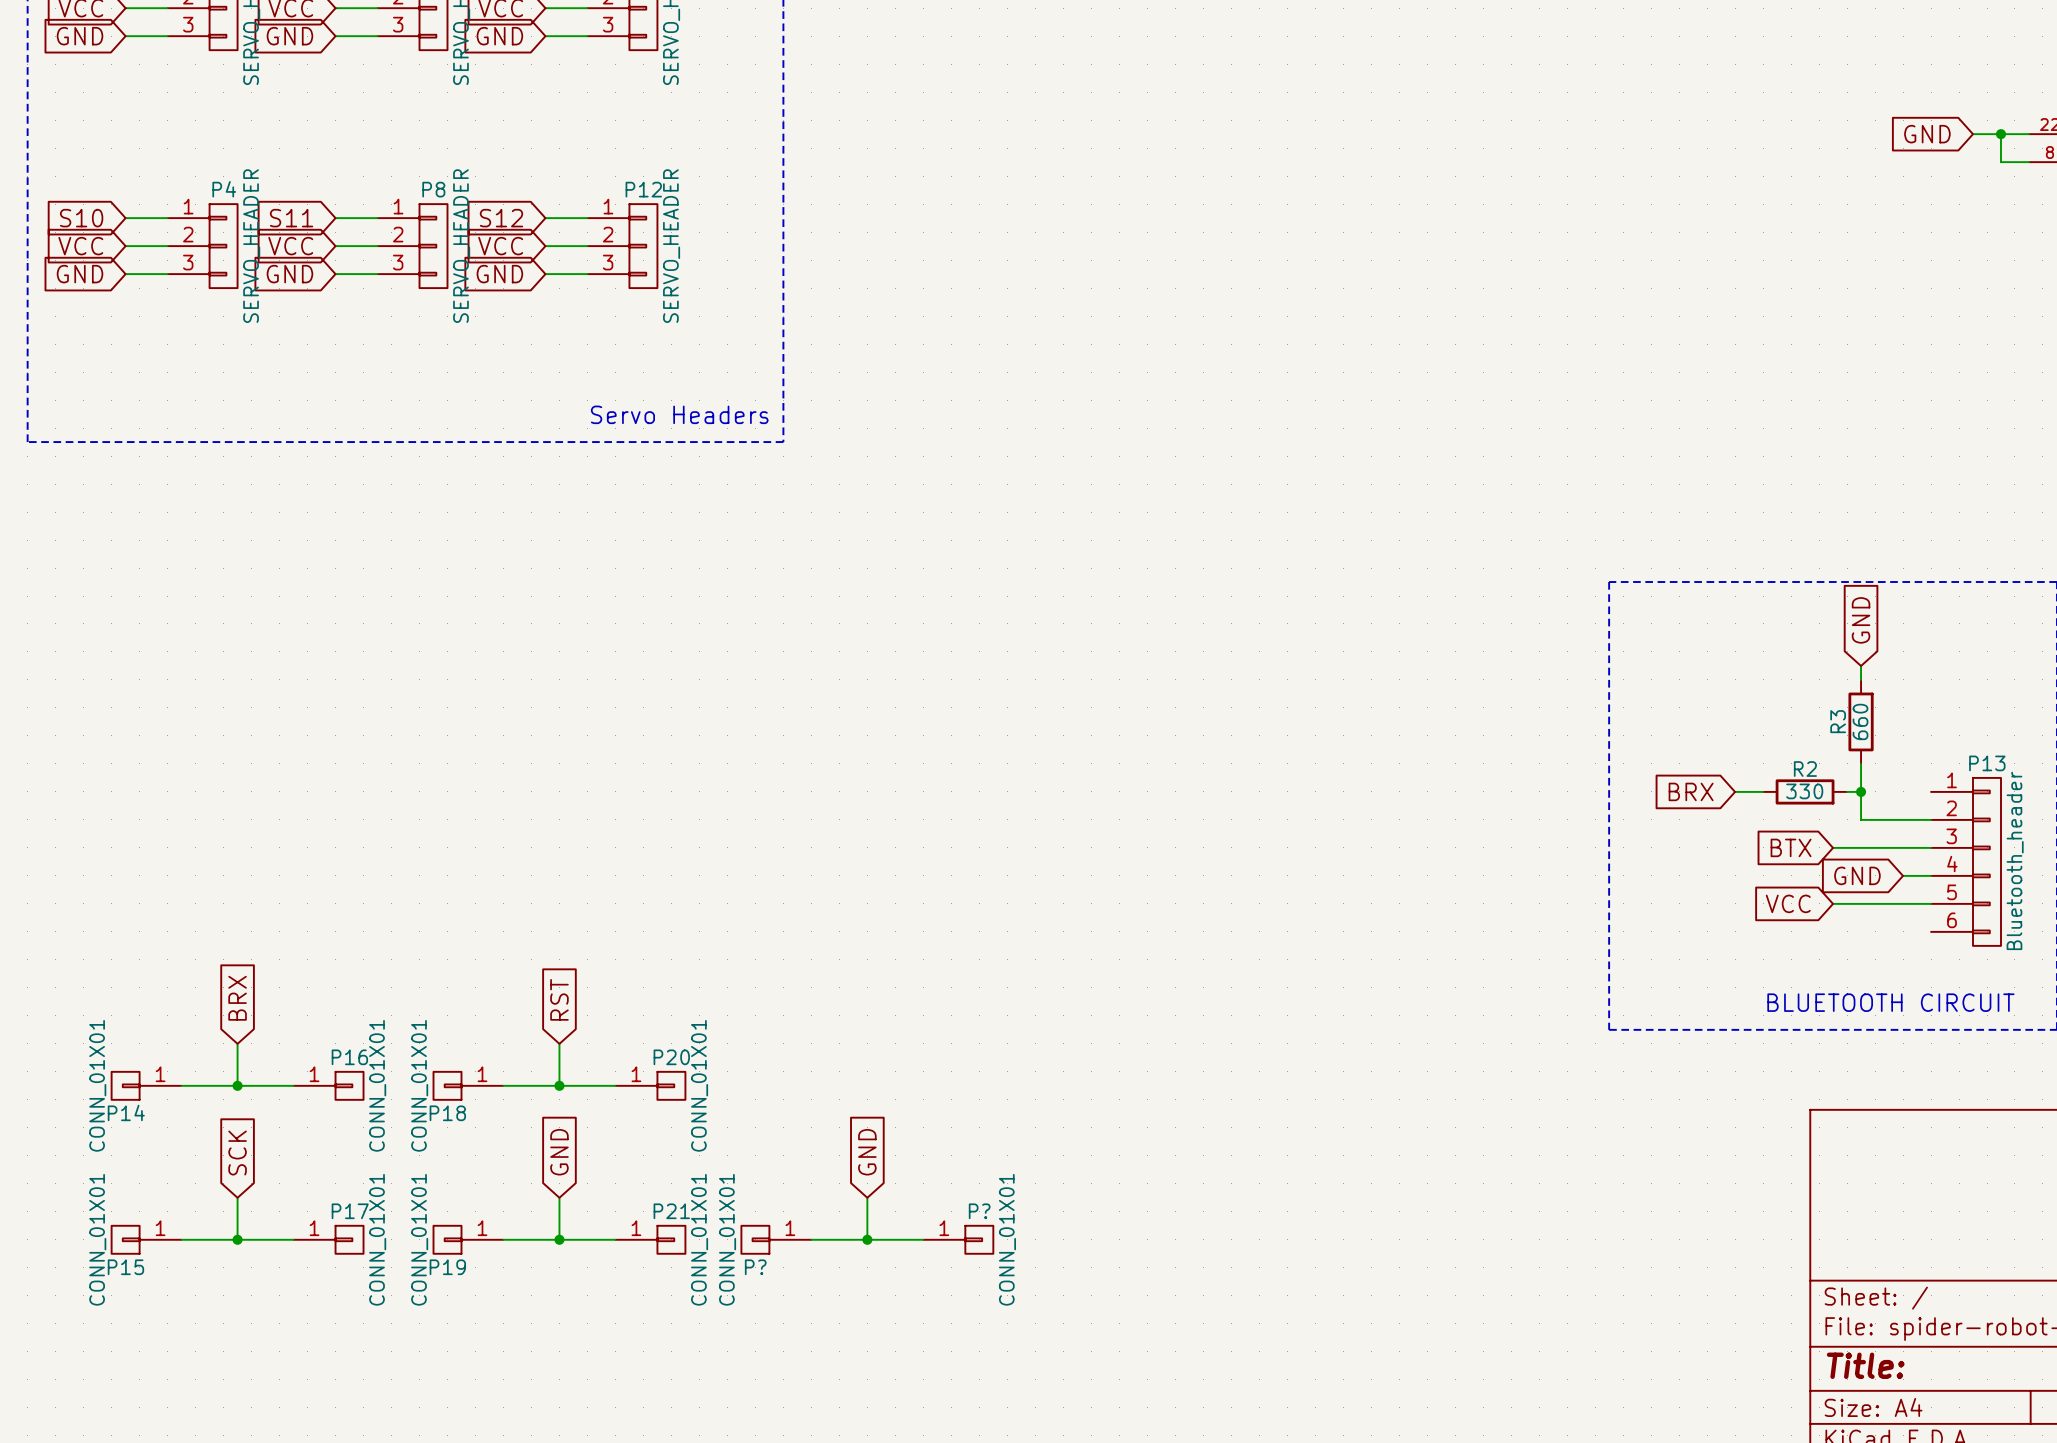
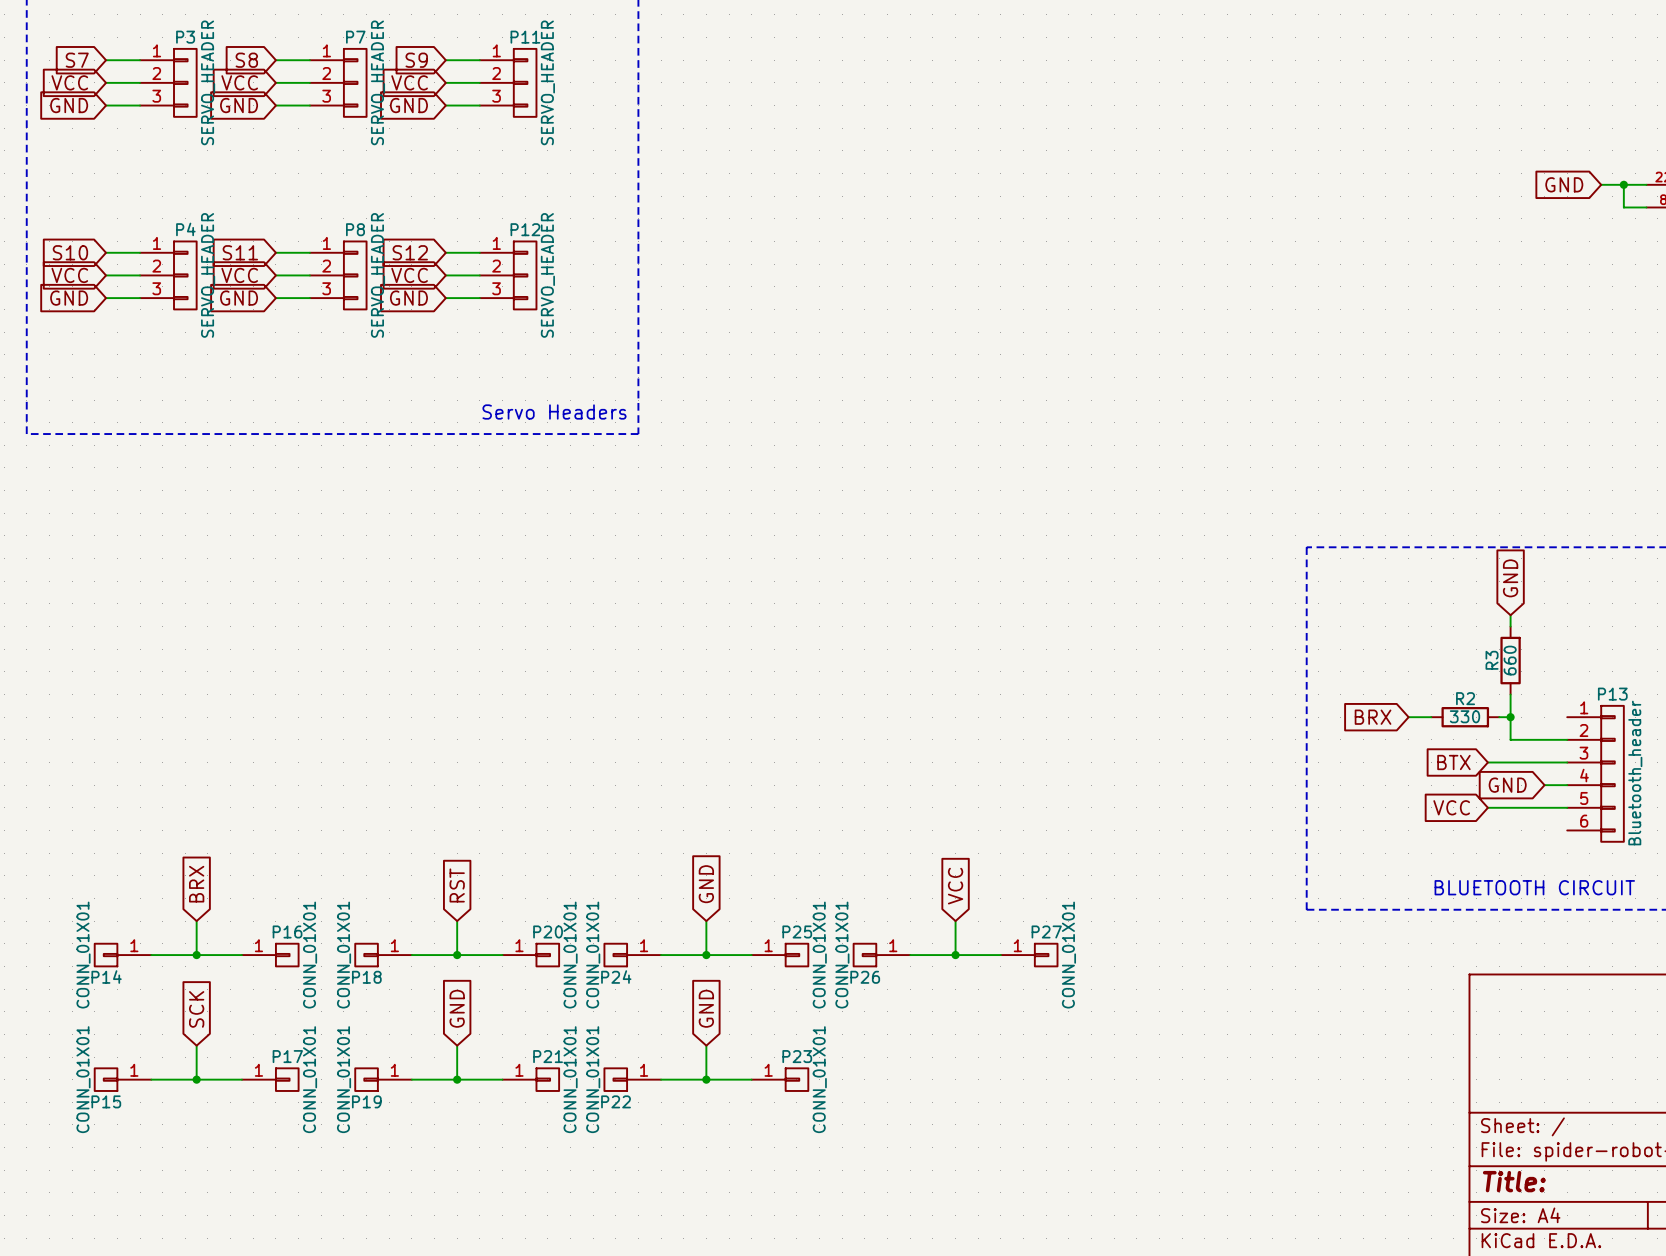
global label: none -> GND (706, 884)
global label: none -> VCC (955, 886)
wire: none -> (706, 921) (706, 955)
wire: none -> (955, 921) (955, 955)
P24: none -> CONN_01X01 (632, 955)
wire: none -> (661, 955) (751, 955)
junction: none -> (706, 955)
P25: none -> CONN_01X01 (779, 955)
P26: none -> CONN_01X01 (881, 955)
wire: none -> (910, 955) (1000, 955)
junction: none -> (955, 955)
P27: none -> CONN_01X01 (1029, 955)
P? name: P? (979, 1211) -> P23 (797, 1056)
P? name: P? (755, 1267) -> P22 (616, 1101)

